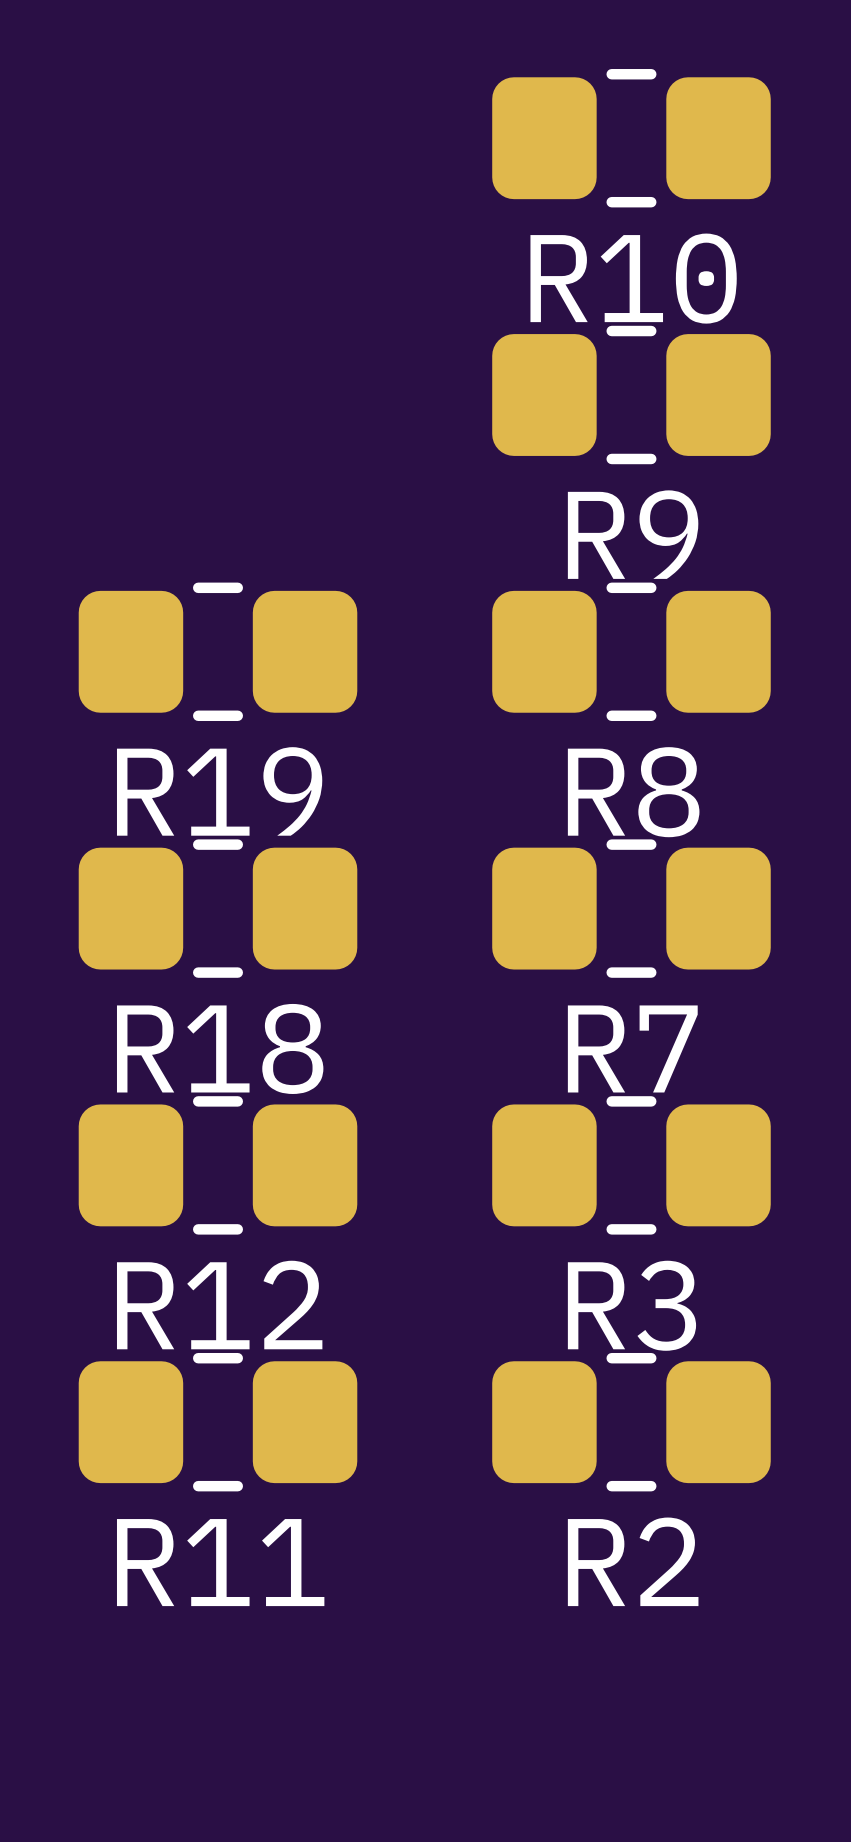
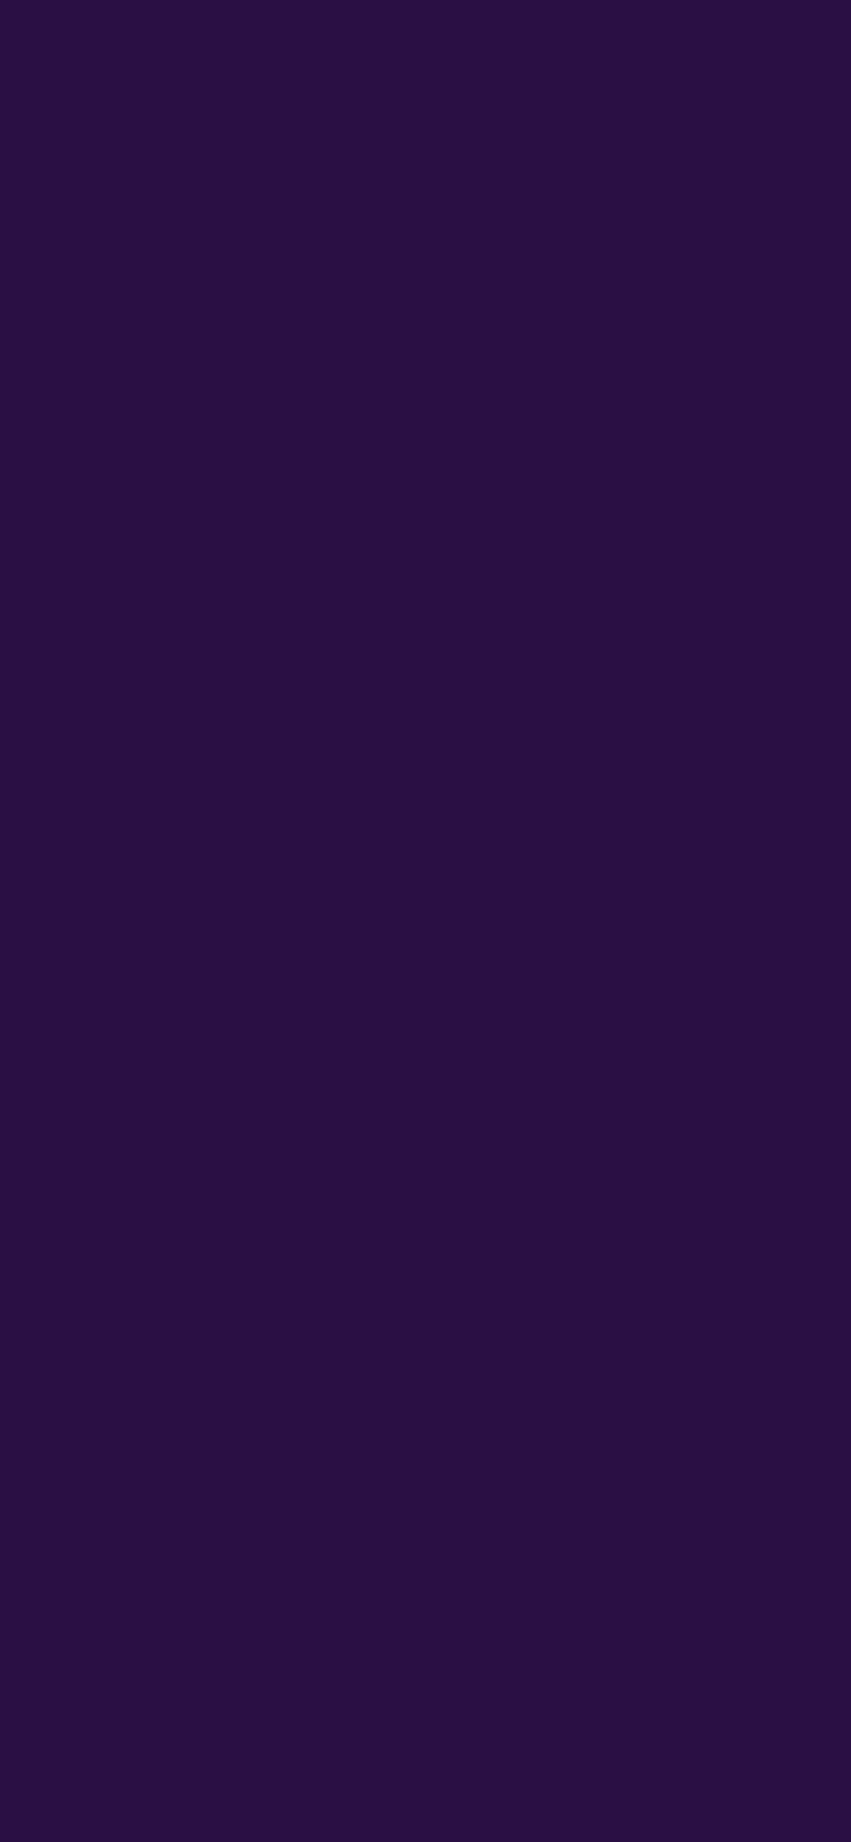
R10: (631, 138) -> none
R9: (631, 395) -> none
R19: (218, 651) -> none
R8: (631, 651) -> none
R18: (218, 908) -> none
R7: (631, 908) -> none
R12: (218, 1165) -> none
R3: (631, 1165) -> none
R11: (218, 1422) -> none
R2: (631, 1422) -> none

